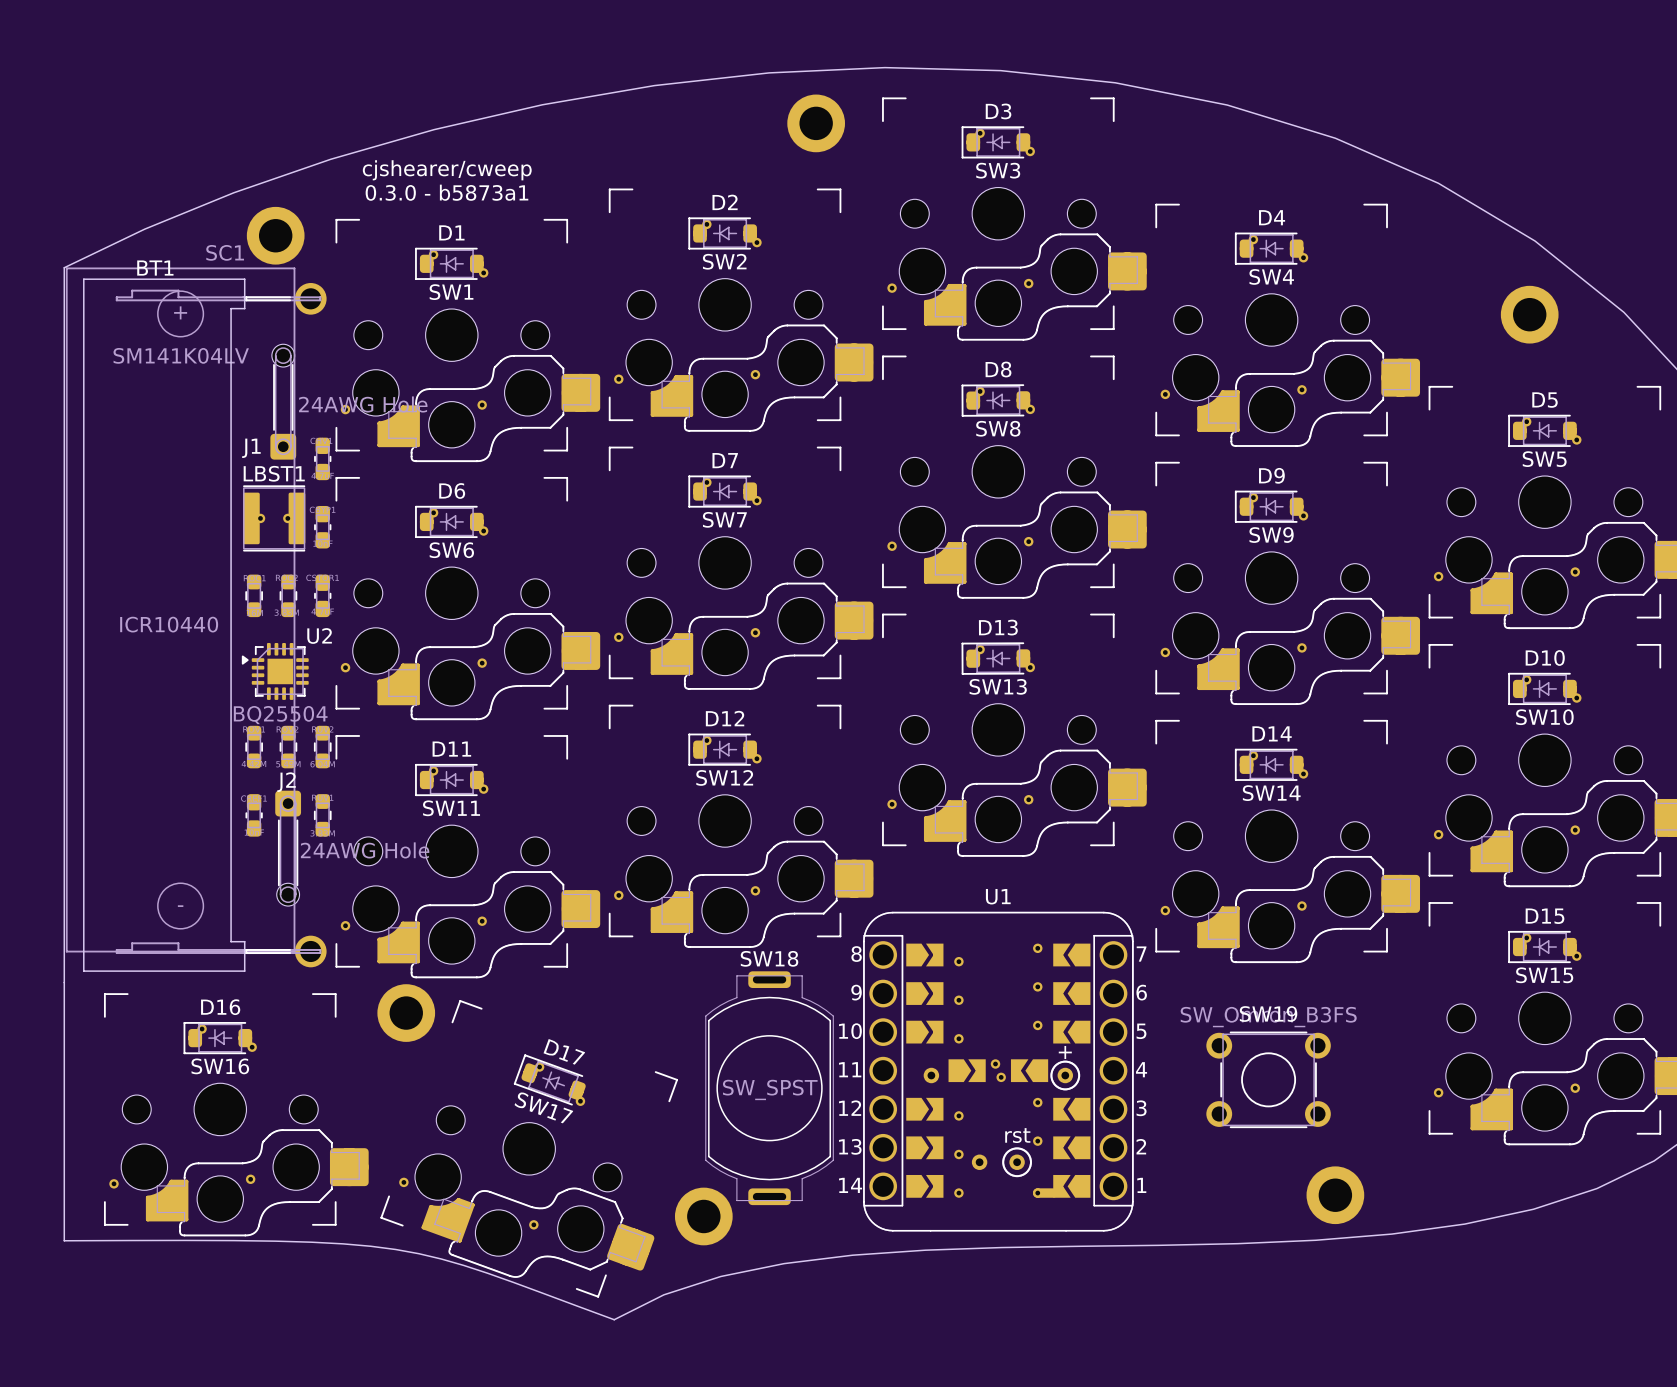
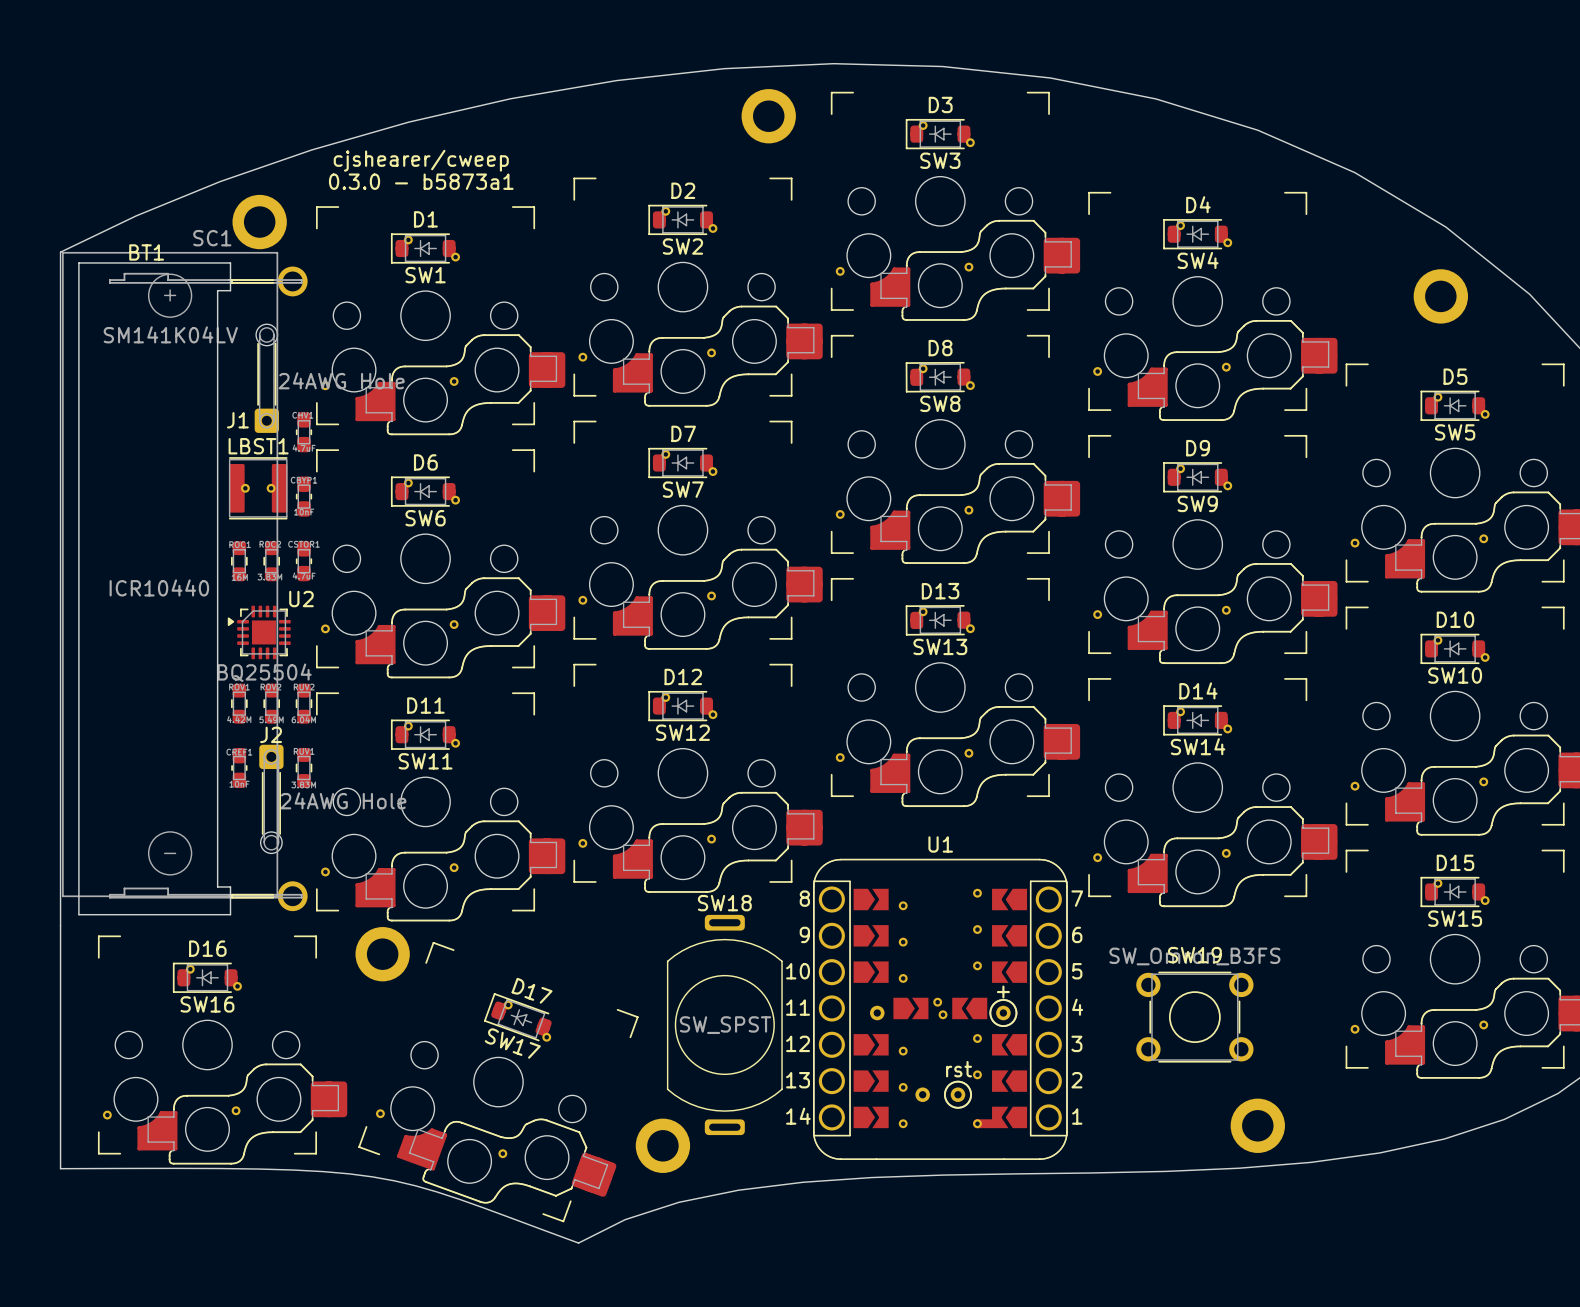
SW18 footprint: [705, 971, 834, 1206] -> [666, 914, 783, 1136]

